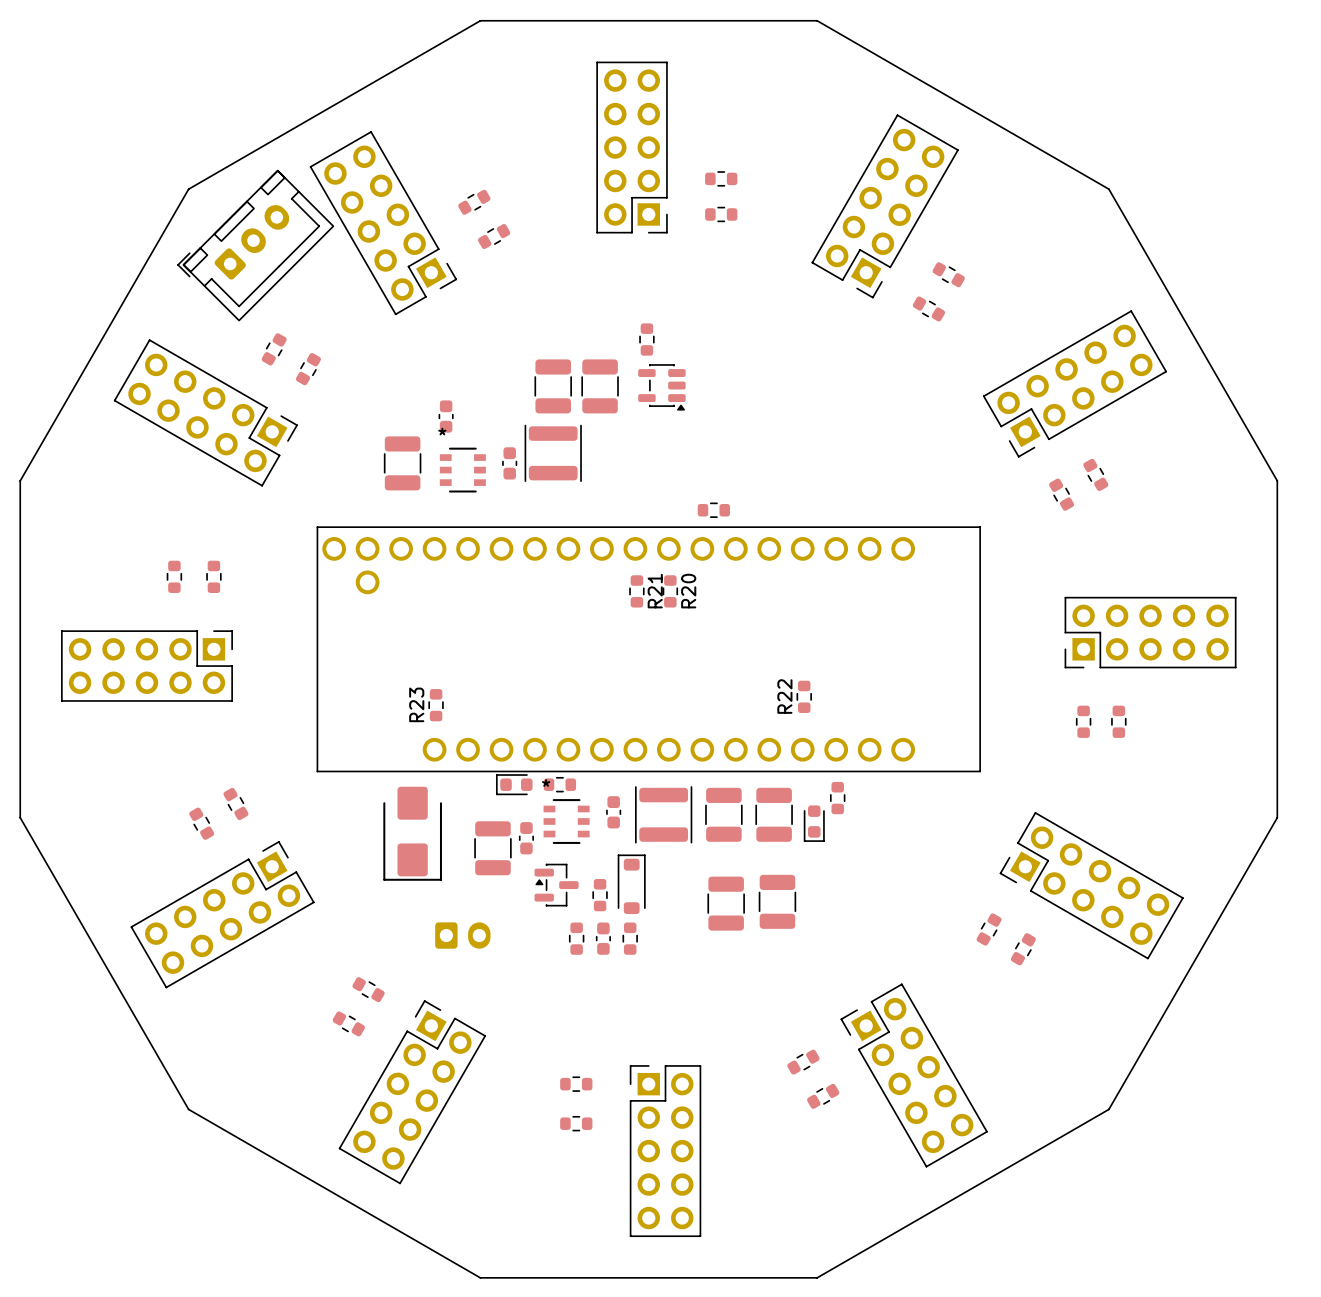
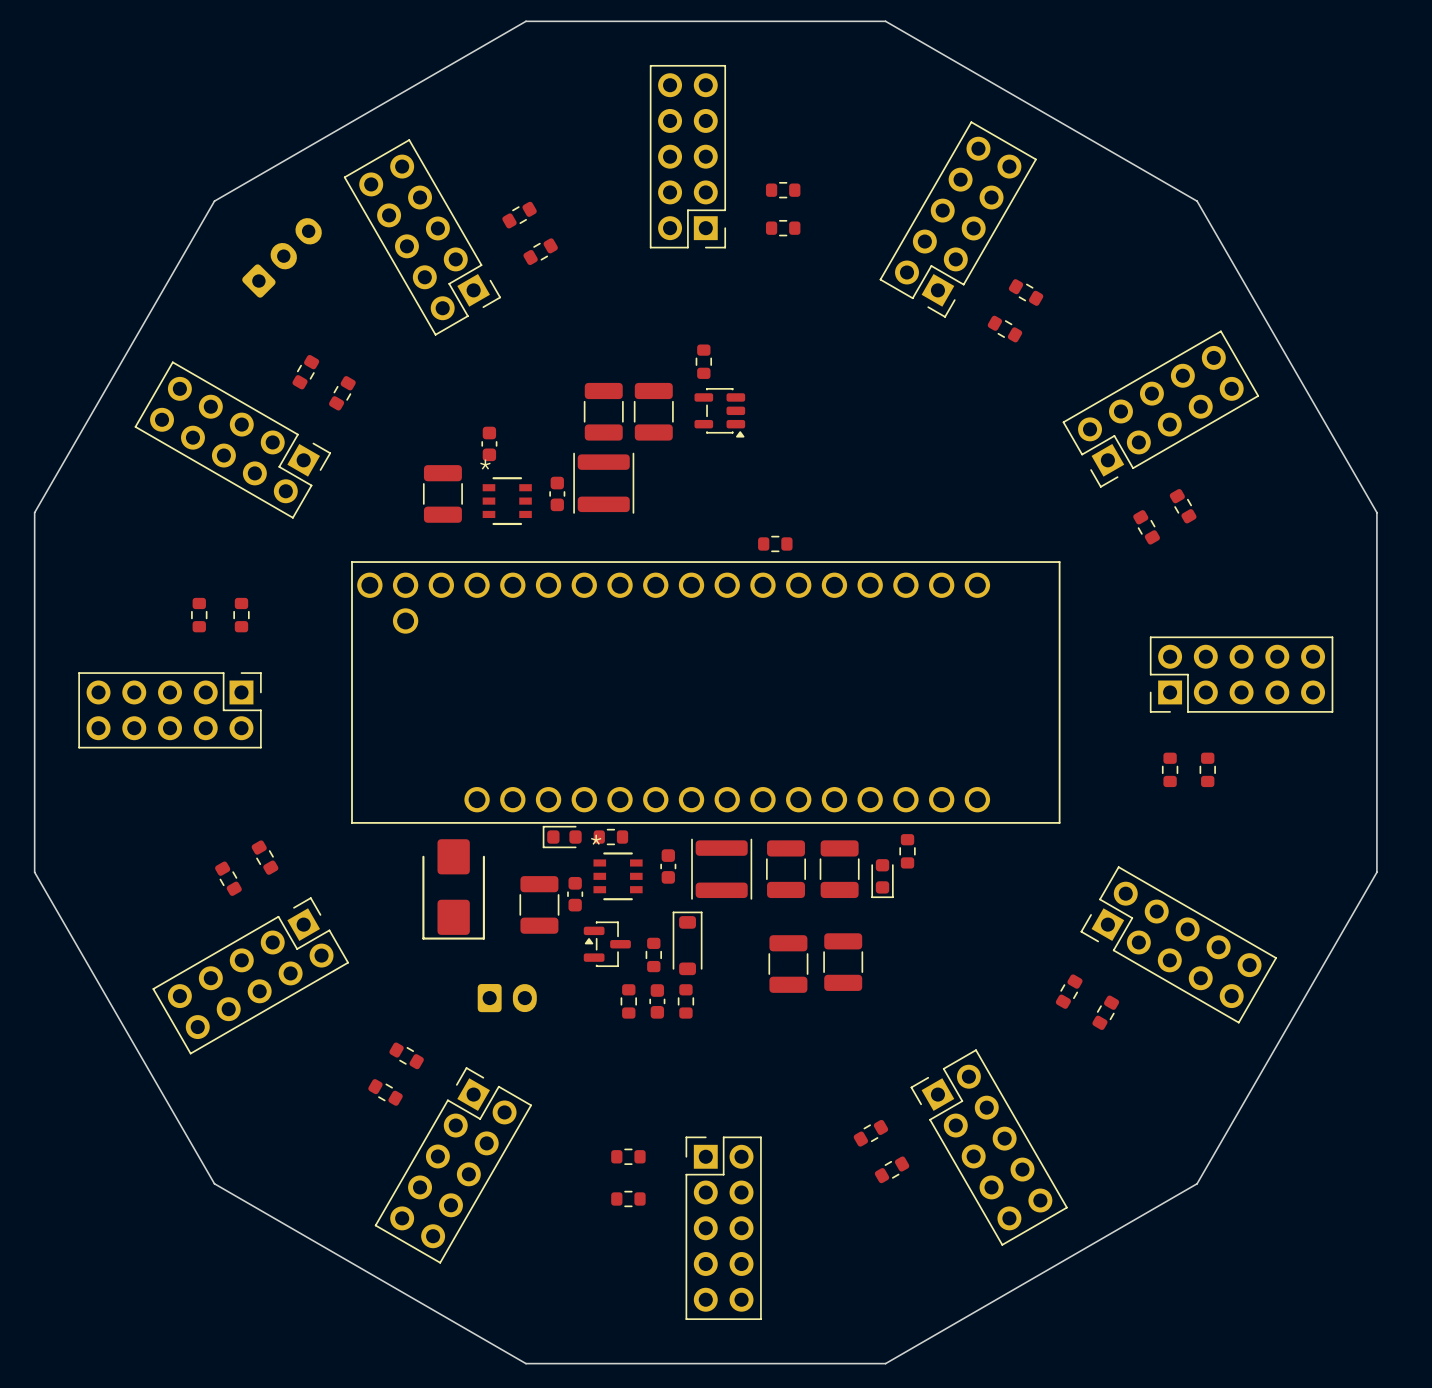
part side: top (255, 245) -> bottom (282, 257)
R21: (636, 591) -> none
R20: (670, 591) -> none
R22: (804, 696) -> none
R23: (436, 705) -> none

